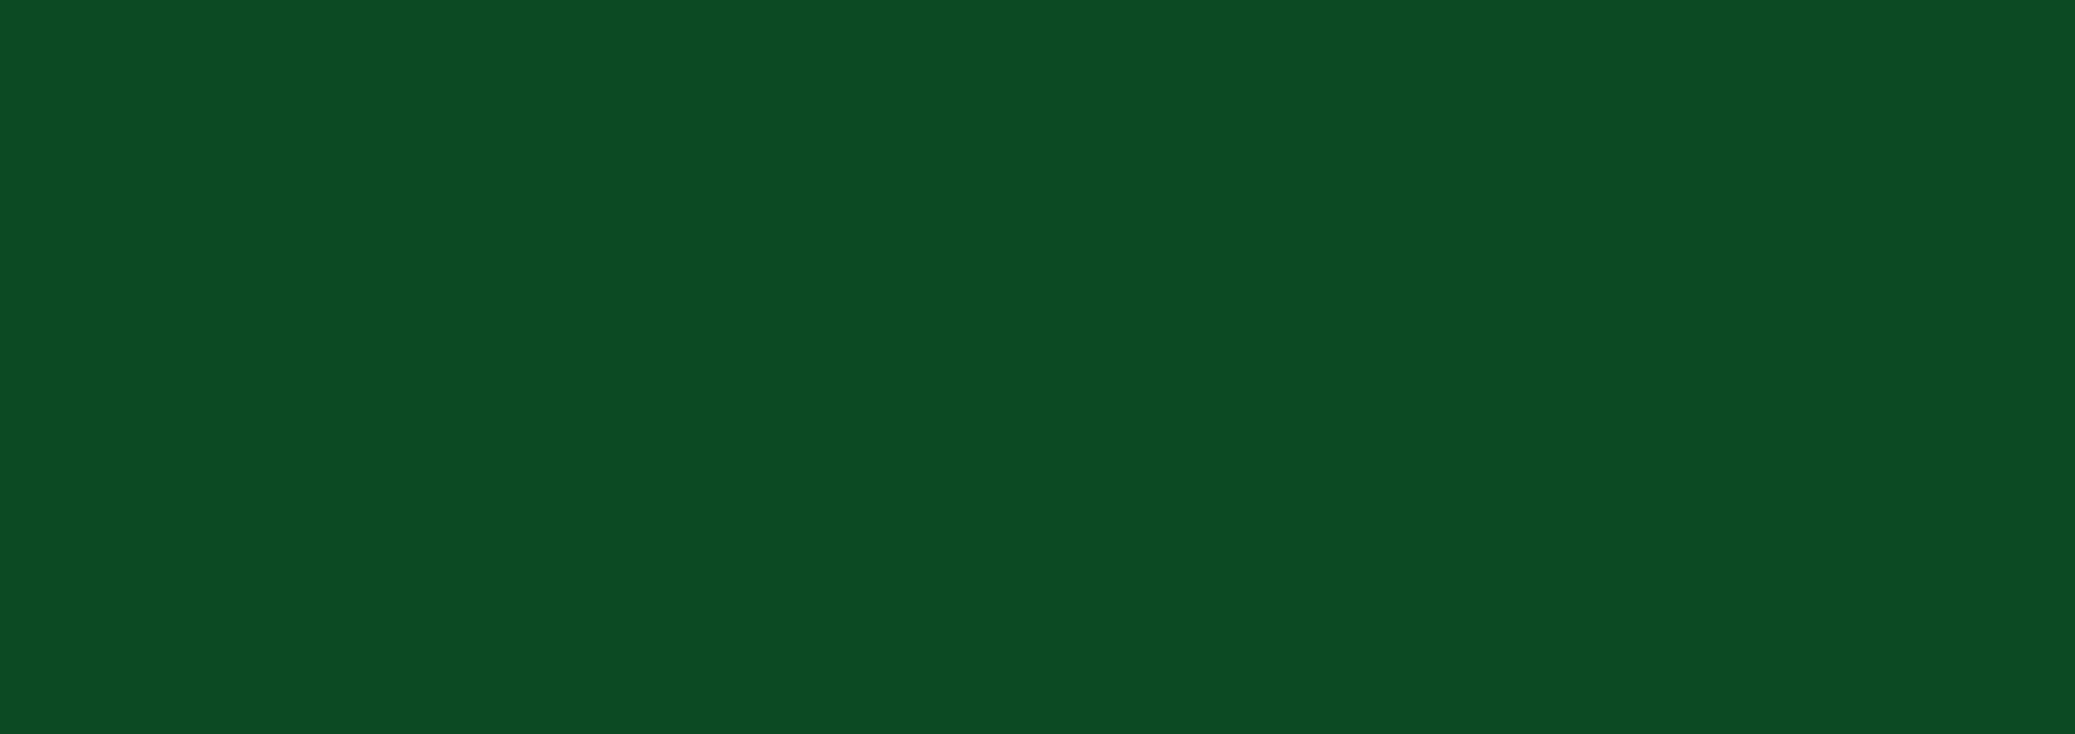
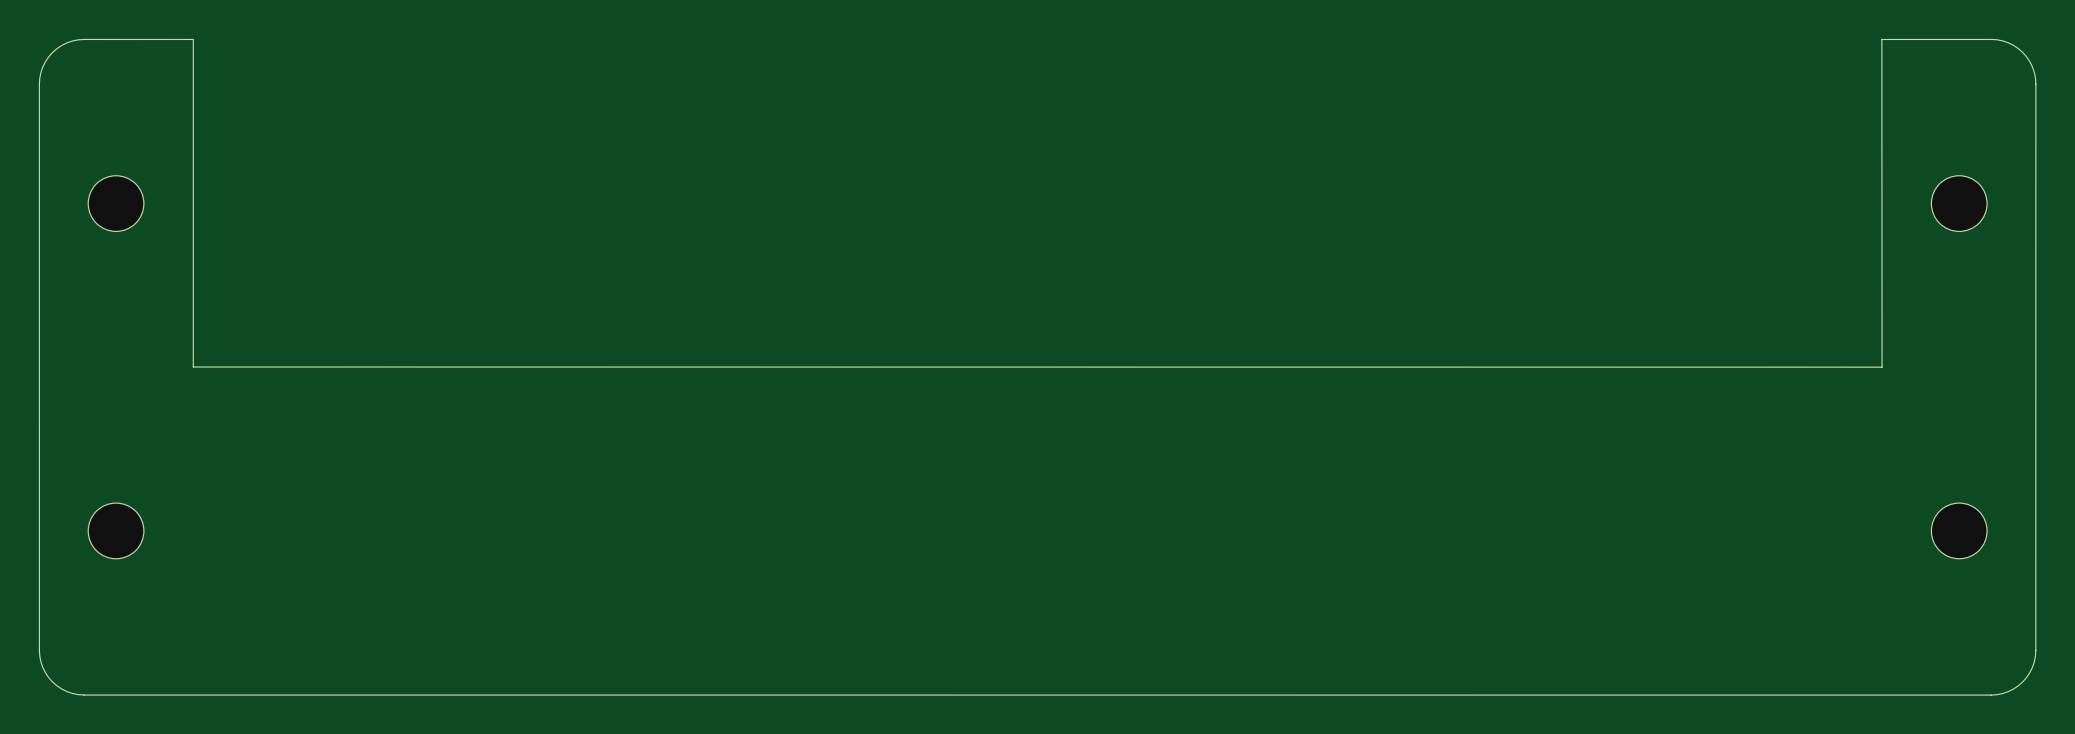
board edge: none -> (1991, 39) (2008, 42) (2022, 52) (2032, 67) (2035, 84) (2035, 650) (2032, 667) (2026, 677) (2018, 685) (2002, 693) (1991, 695) (84, 695) (66, 691) (56, 685) (45, 672) (40, 661) (39, 84) (40, 72) (48, 56) (61, 45) (72, 40) (193, 39) (193, 367) (1882, 367) (1881, 39) (1991, 39)
part: none -> (116, 203)
part: none -> (1959, 203)
part: none -> (116, 530)
part: none -> (1959, 530)

